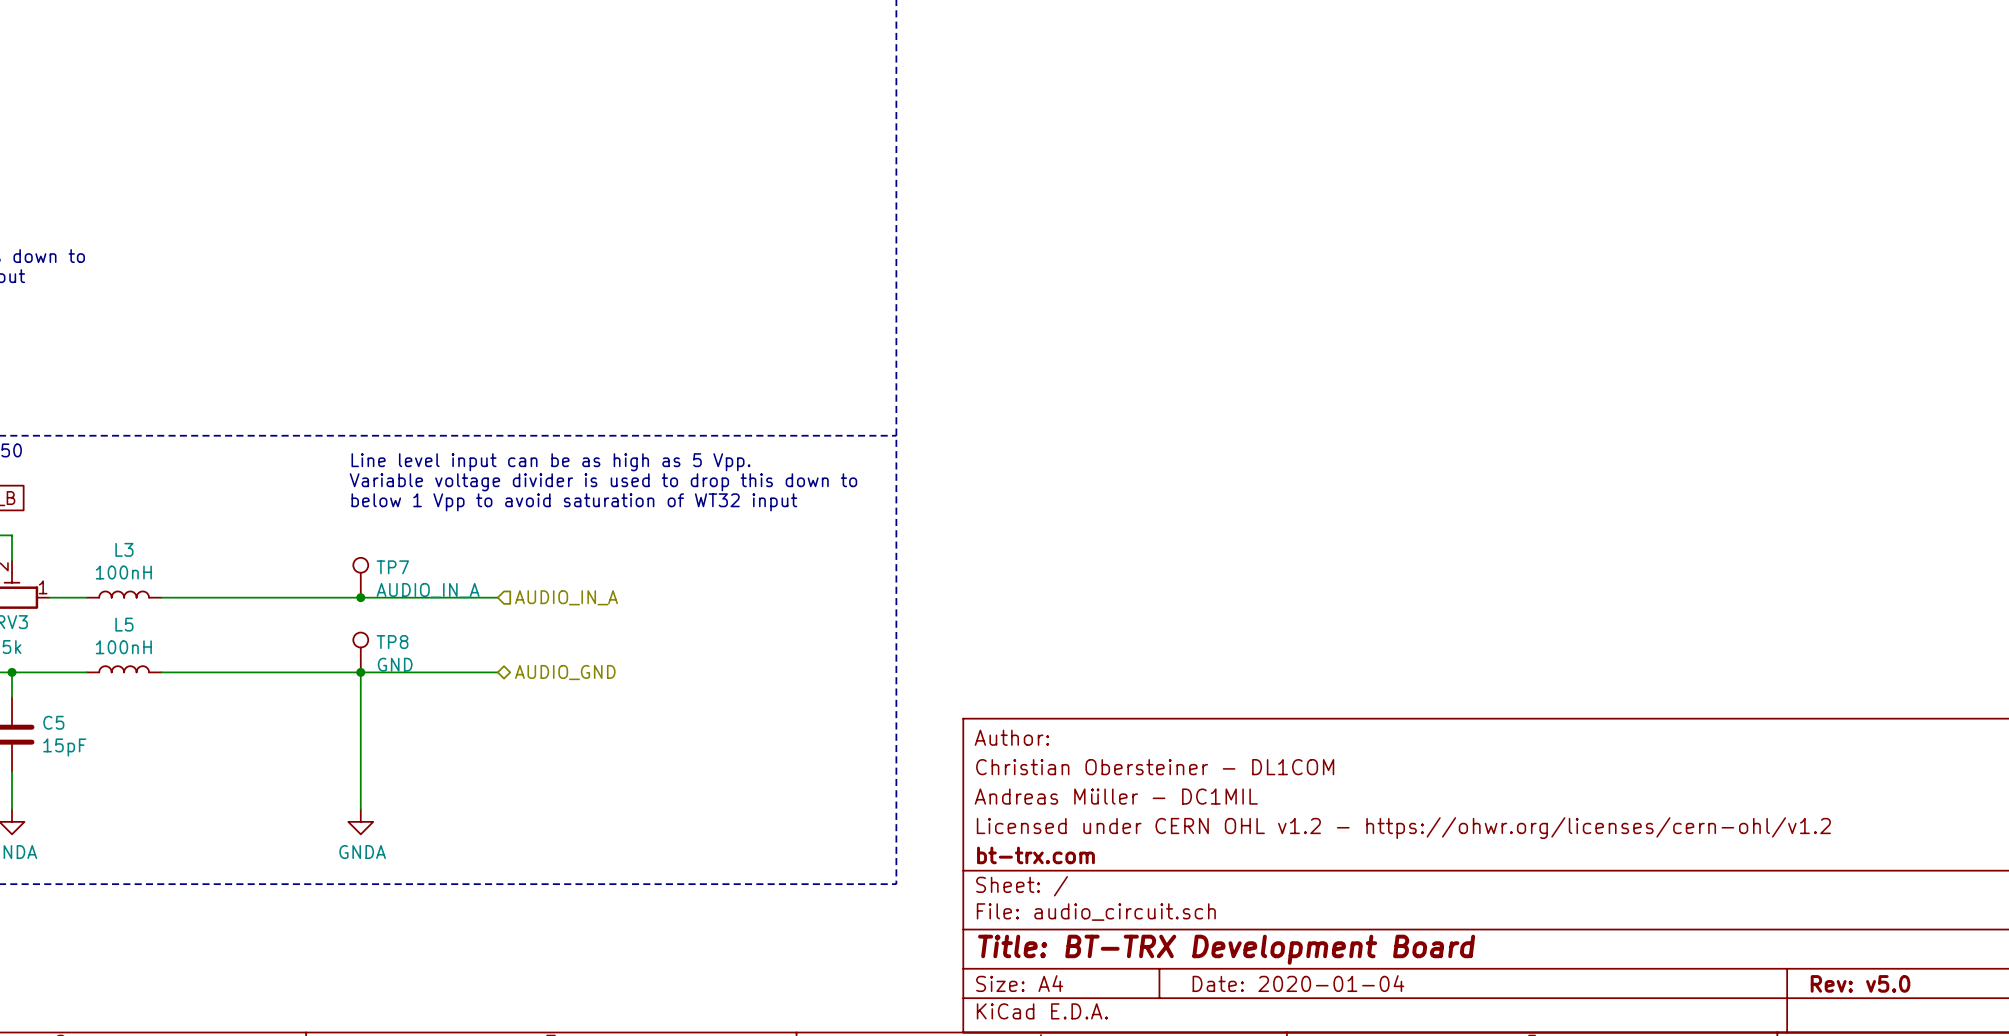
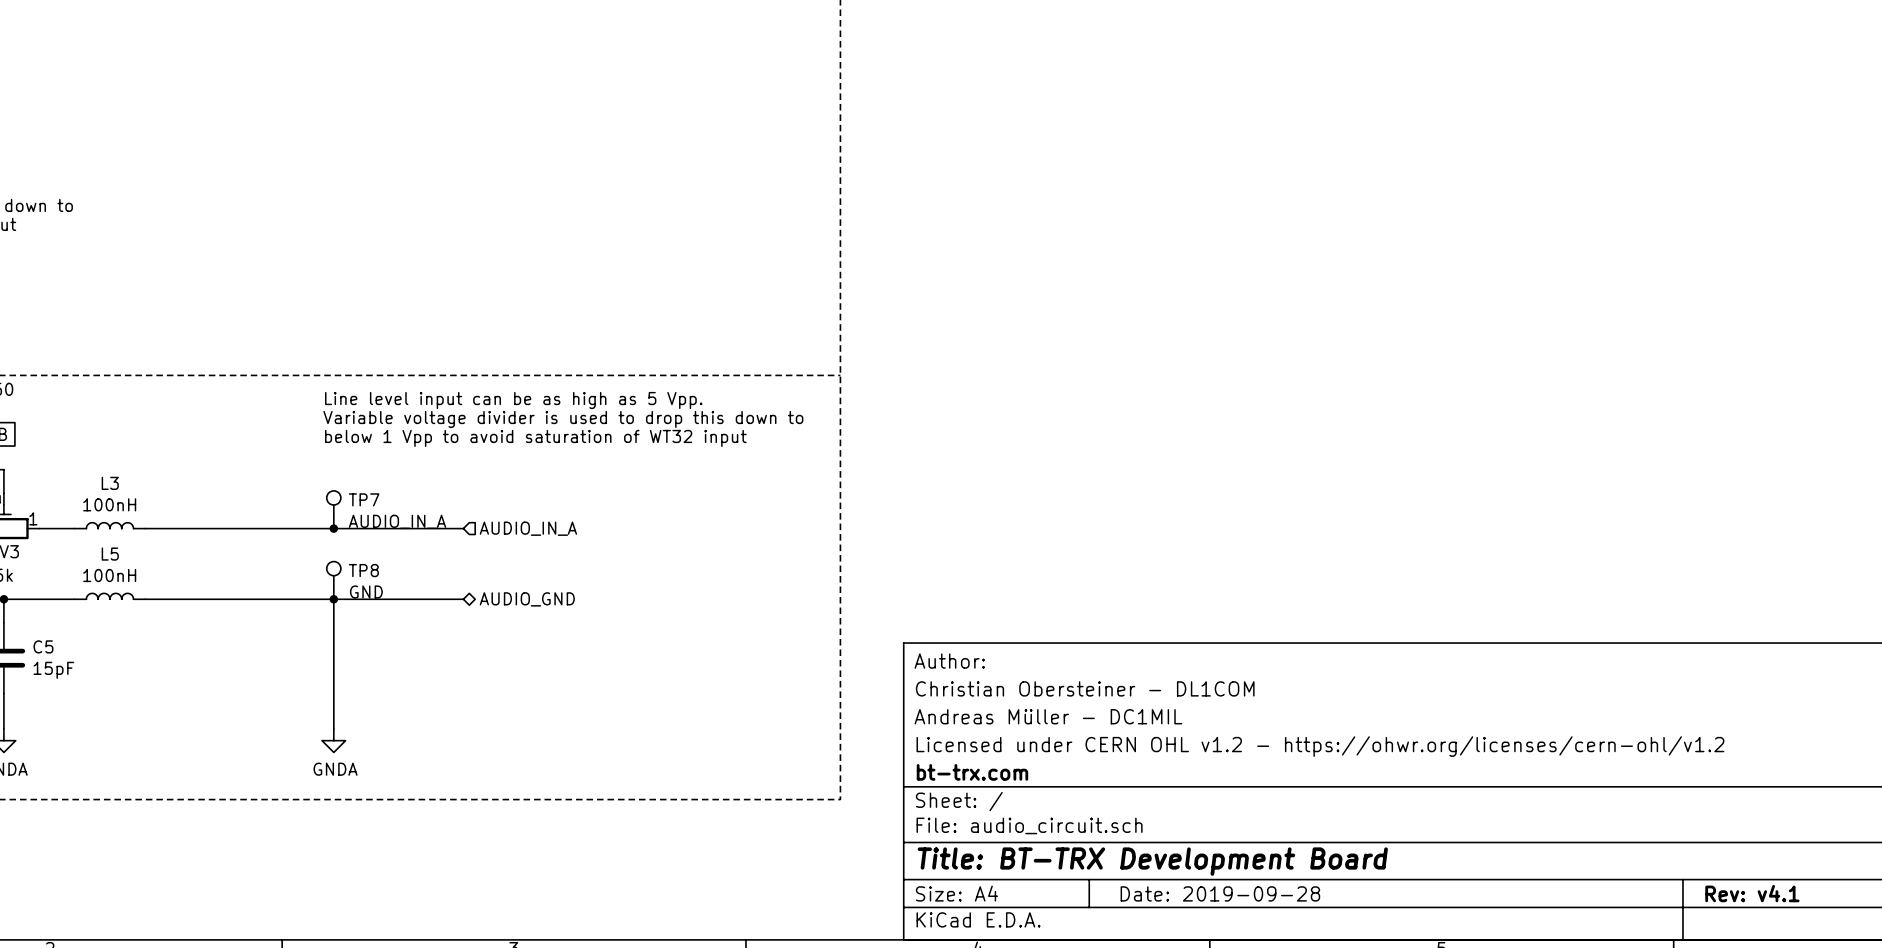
title block: Date: 2020-01-04 (1298, 983) -> Date: 2019-09-28 (1220, 893)
title block: Rev: v5.0 (1860, 983) -> Rev: v4.1 (1752, 893)

